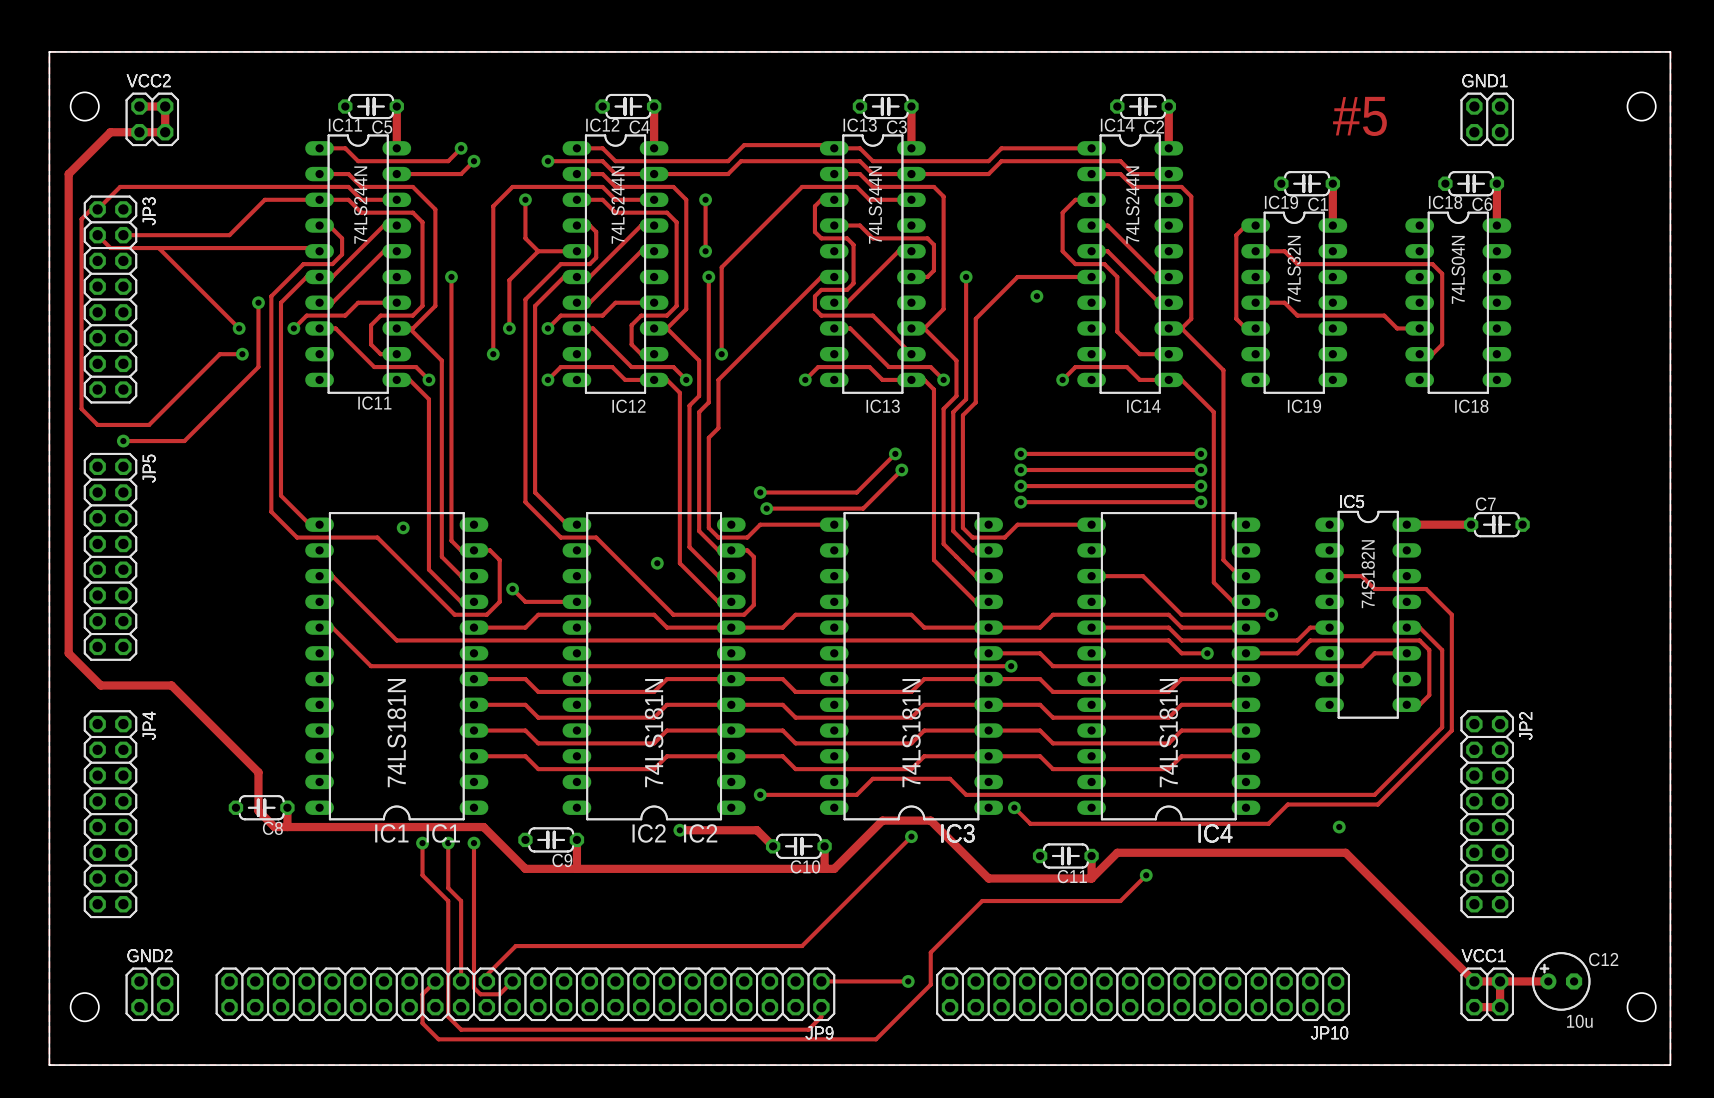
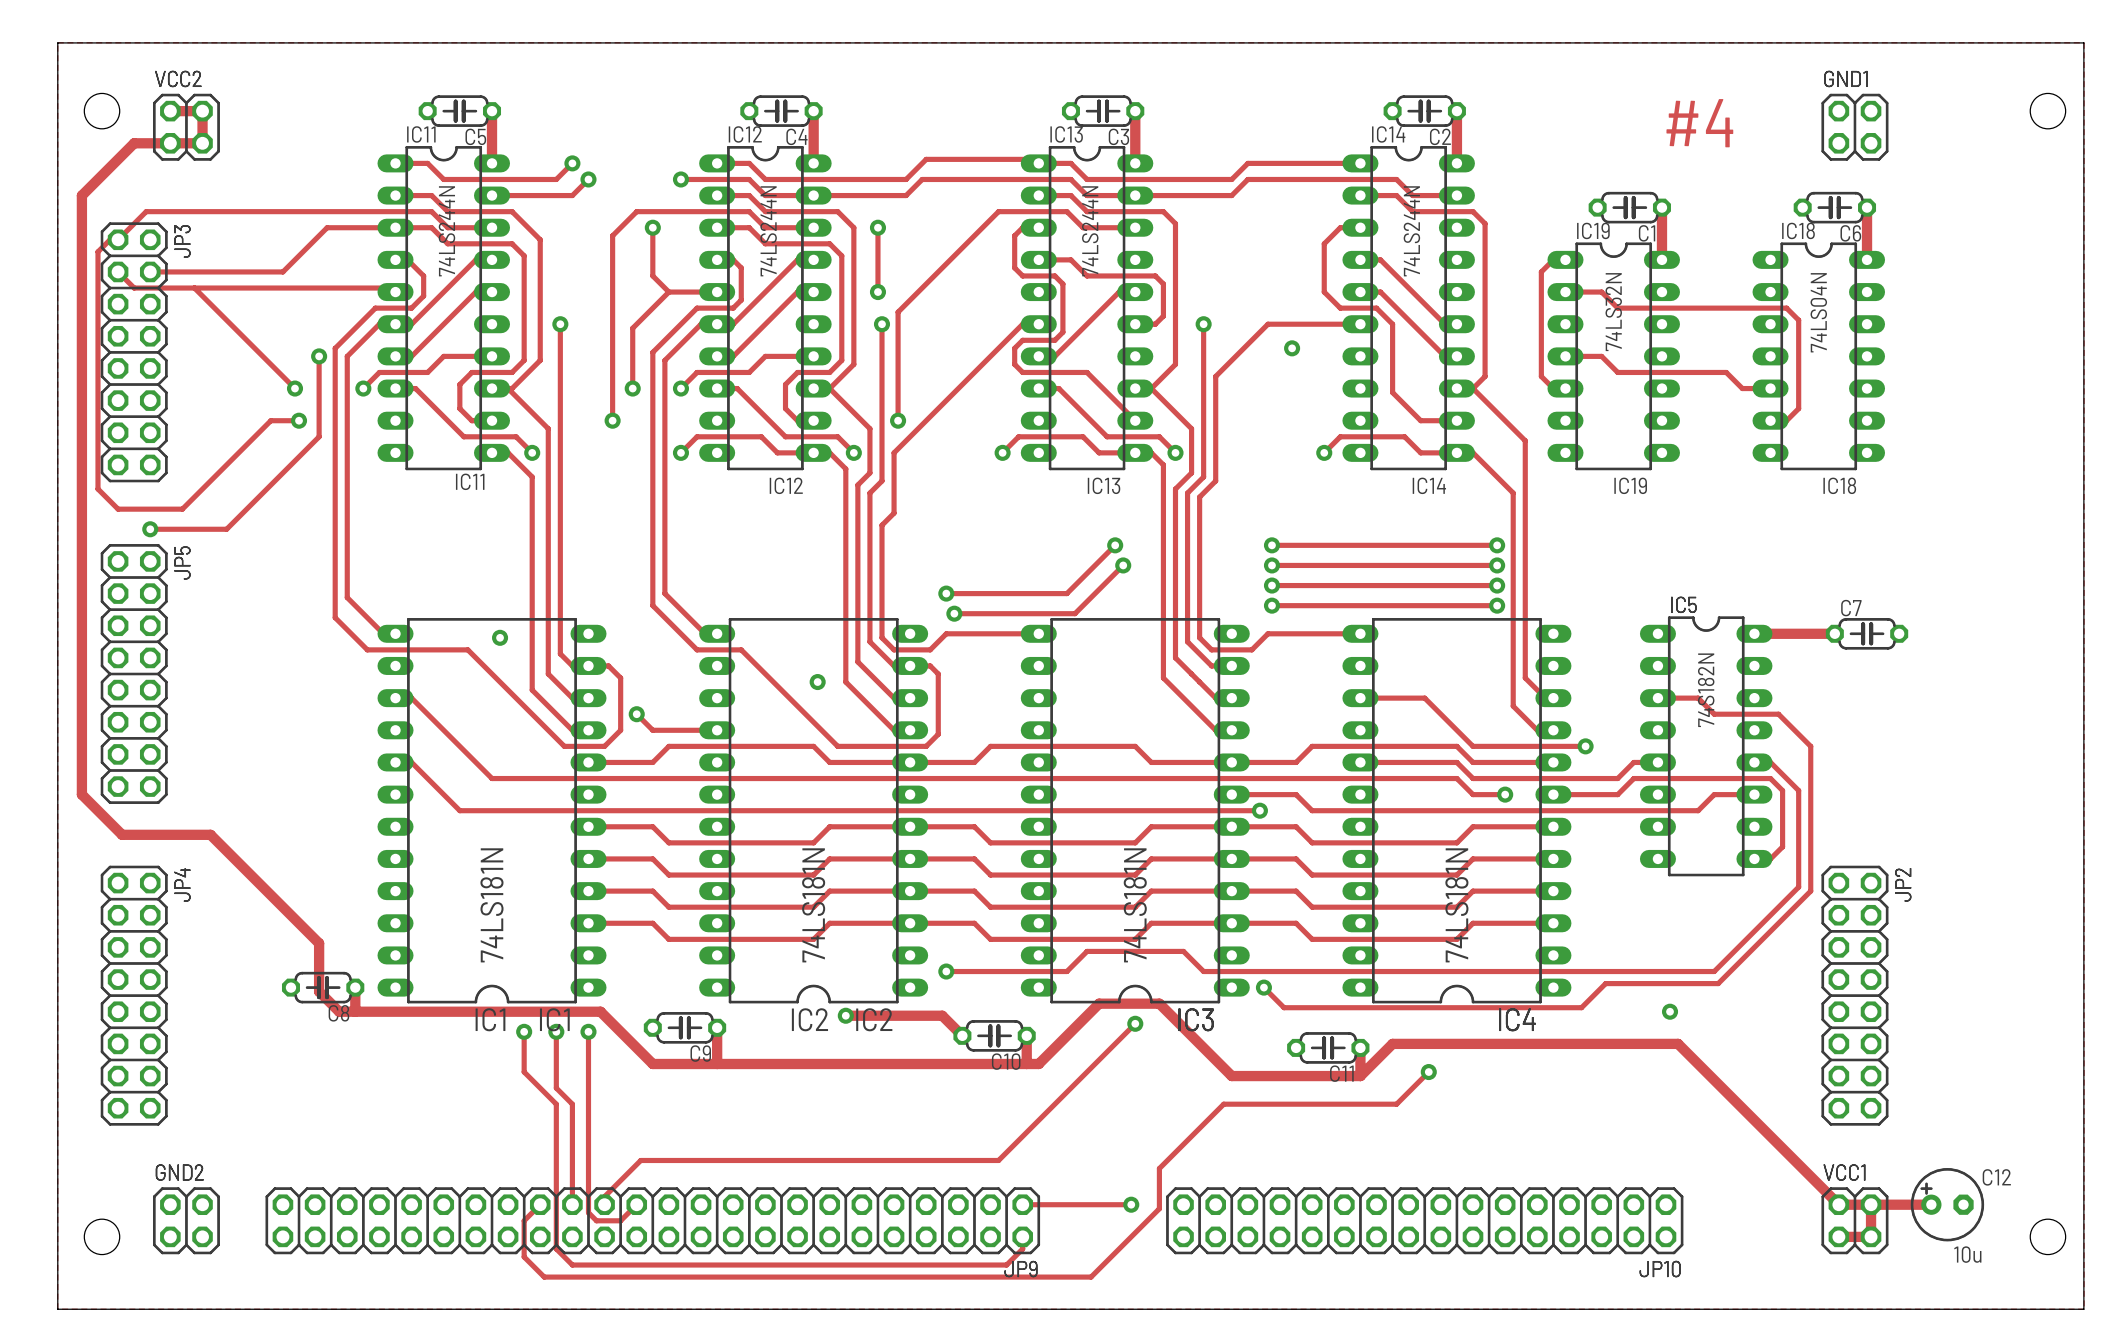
text: #5 (1359, 116) -> #4 (1699, 123)

